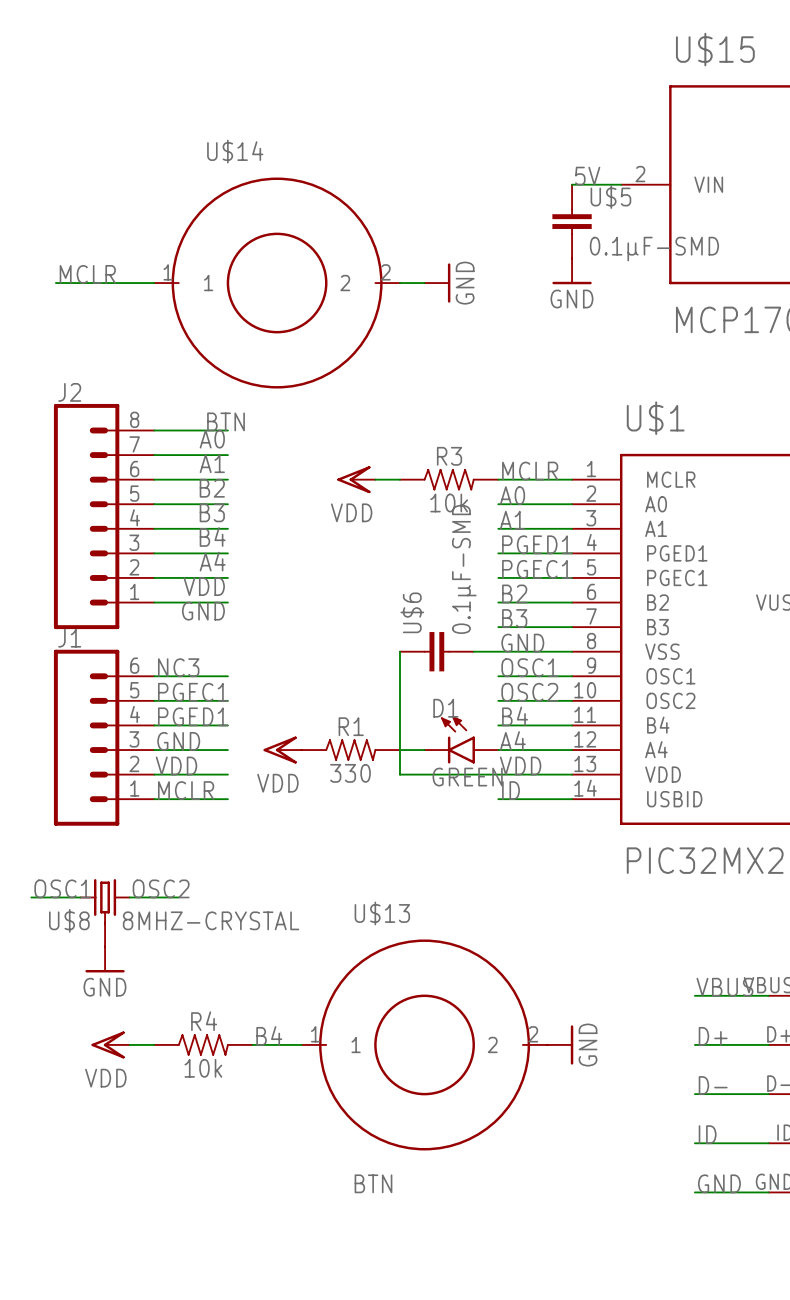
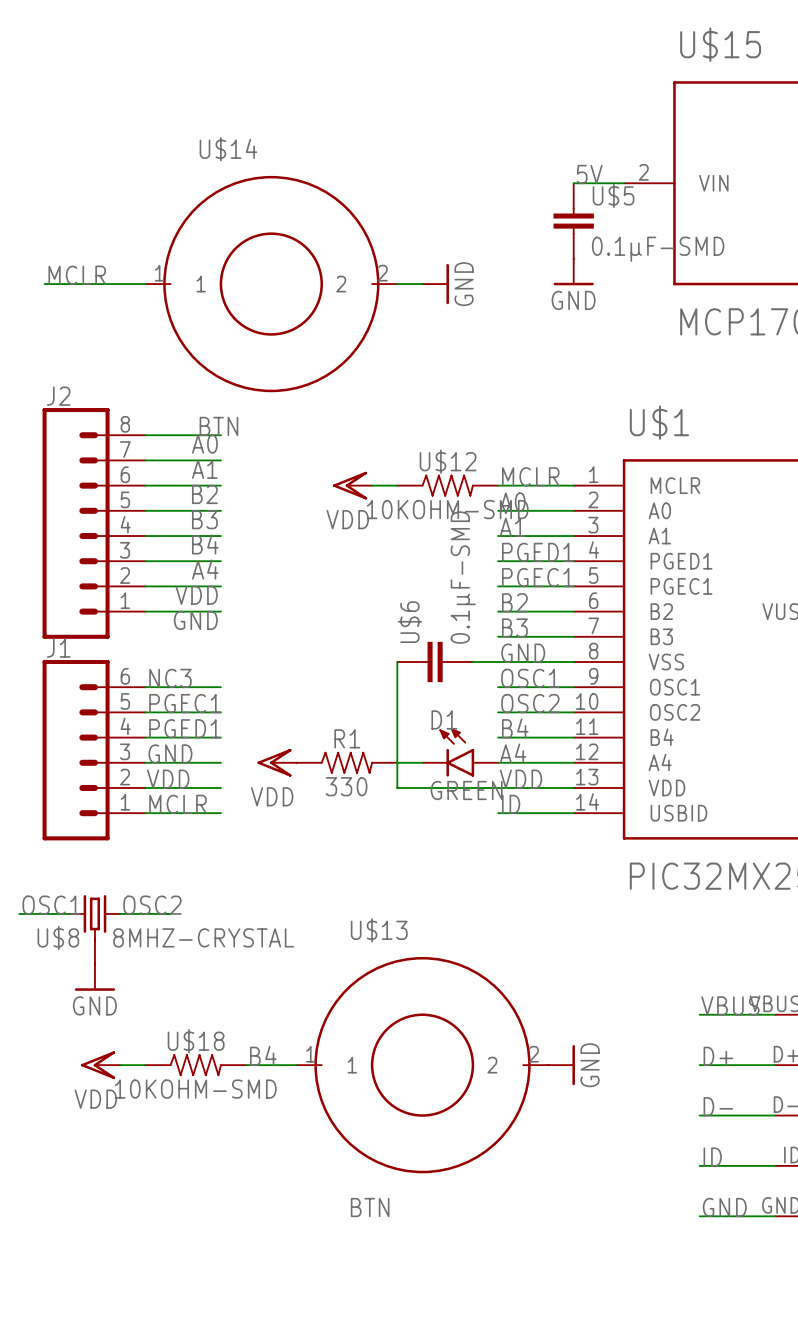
R3 name: R3 (449, 456) -> U$12 (448, 461)
R3 value: 10k (449, 503) -> 10KOHM-SMD (447, 509)
R4 name: R4 (204, 1021) -> U$18 (196, 1041)
R4 value: 10k (203, 1068) -> 10KOHM-SMD (195, 1089)

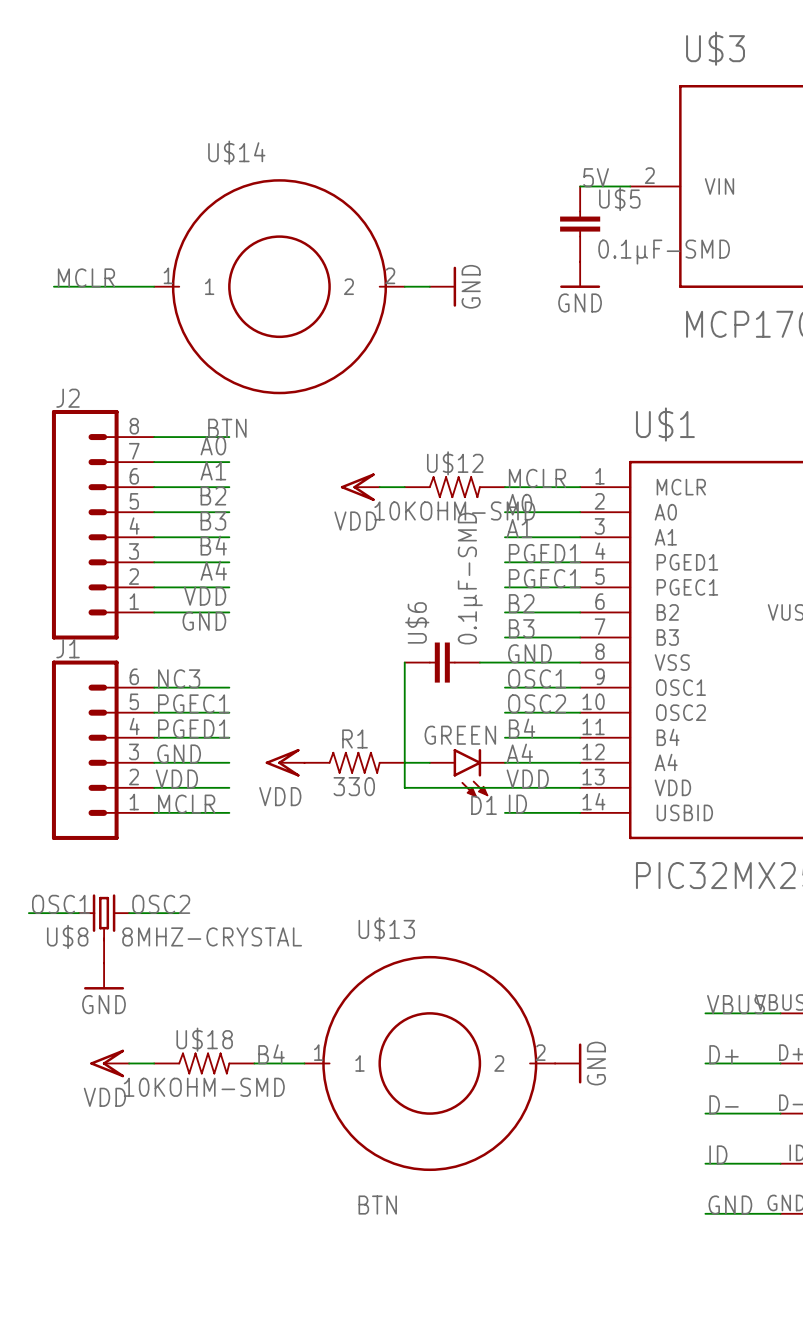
U$15 name: U$15 (720, 44) -> U$3 (715, 48)
D1 rotation: 0° (456, 752) -> 180° (470, 773)

